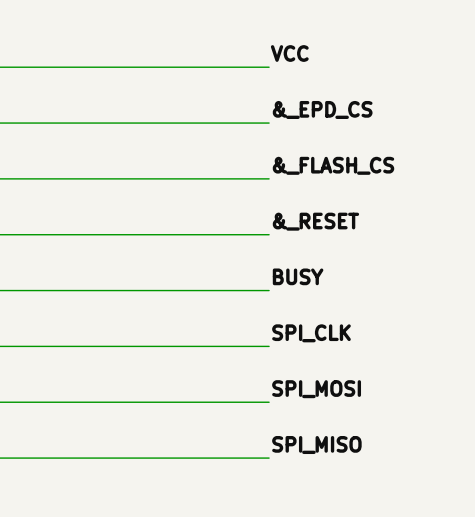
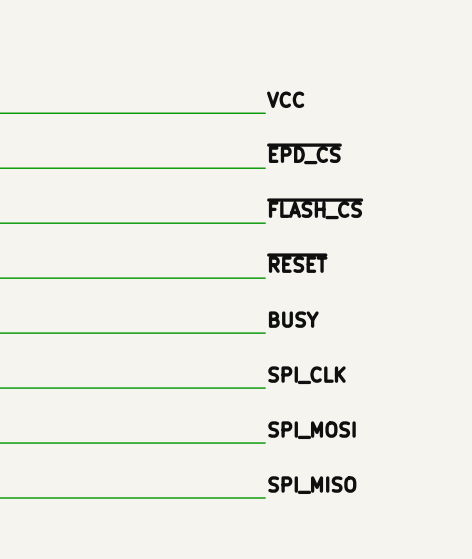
label: &_EPD_CS (322, 109) -> ~{EPD_CS} (304, 153)
label: &_FLASH_CS (333, 165) -> ~{FLASH_CS} (315, 208)
label: &_RESET (315, 221) -> ~{RESET} (297, 263)

